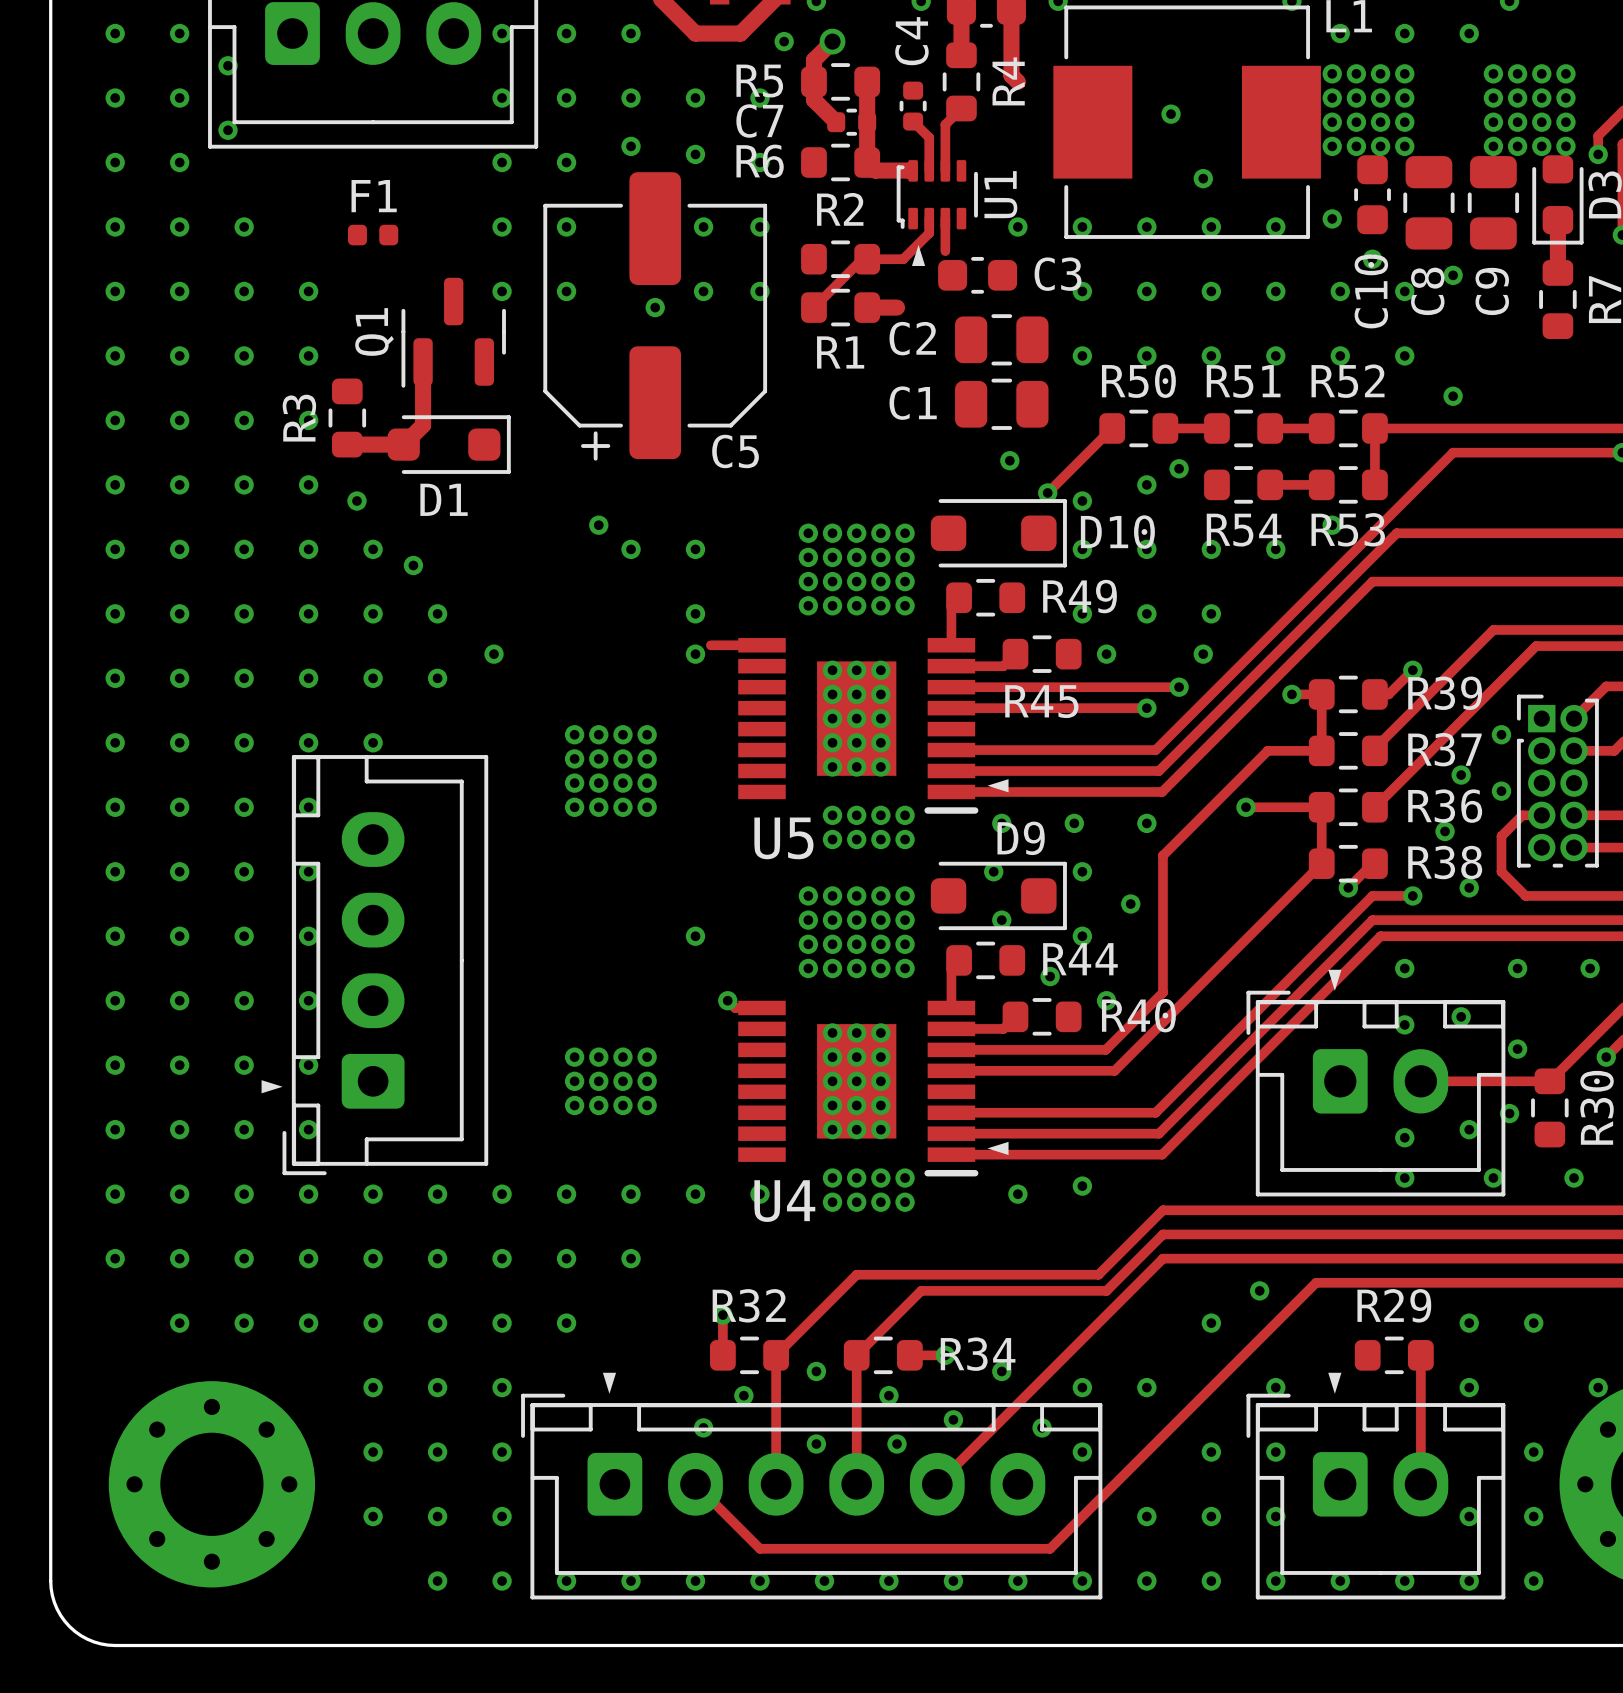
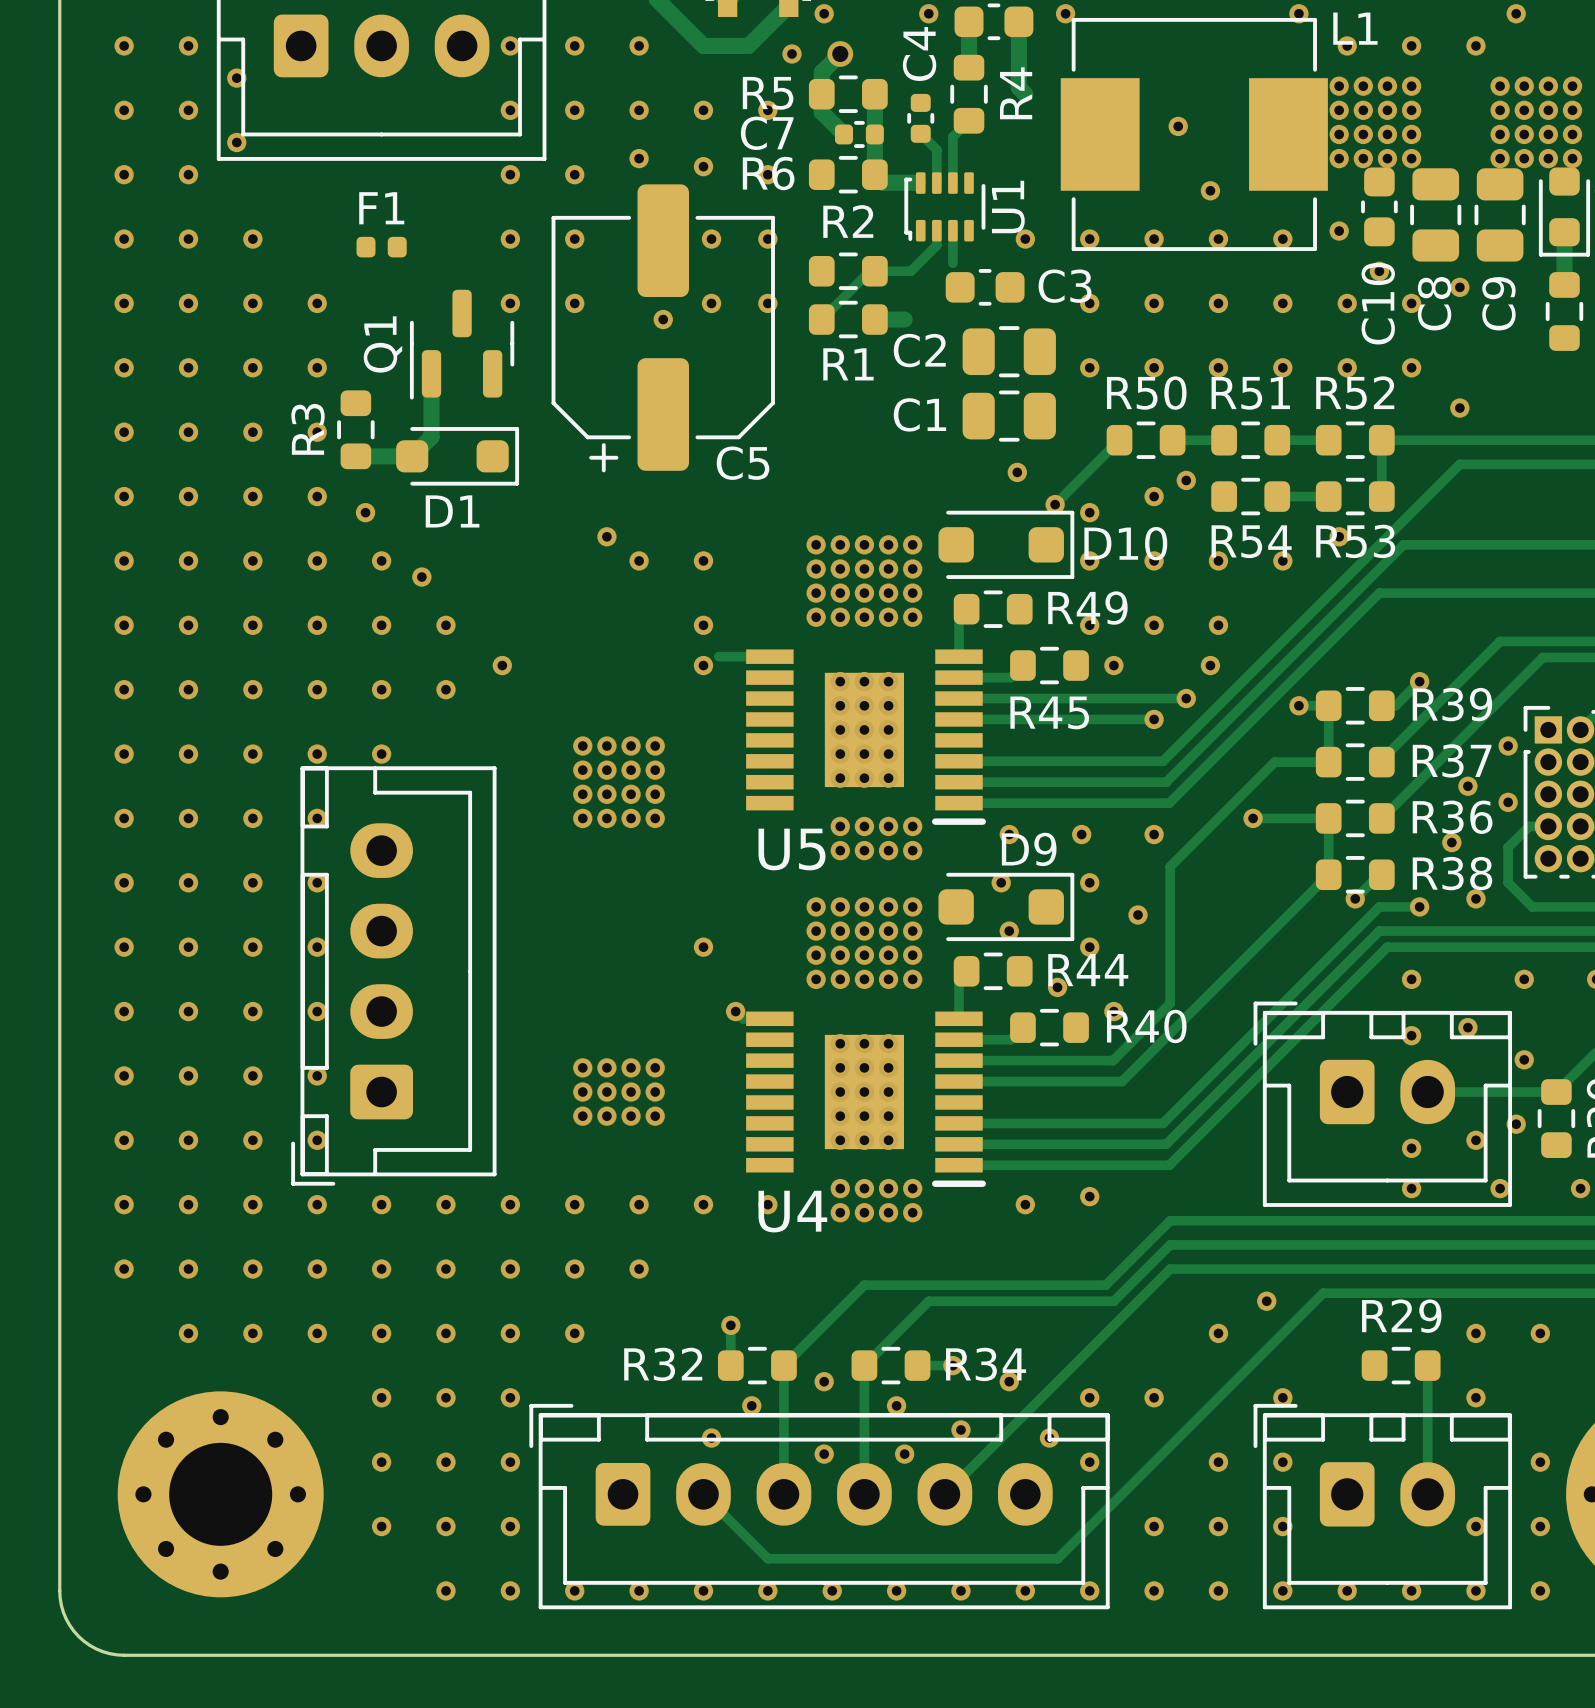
drawing: [911, 244, 926, 266] -> none
drawing: [987, 779, 1009, 793] -> none
drawing: [1328, 969, 1342, 991] -> none
drawing: [261, 1080, 283, 1094] -> none
drawing: [987, 1141, 1009, 1156] -> none
R32 name position: R32 (749, 1305) -> R32 (663, 1364)
drawing: [602, 1372, 617, 1394] -> none
drawing: [1328, 1372, 1342, 1394] -> none

